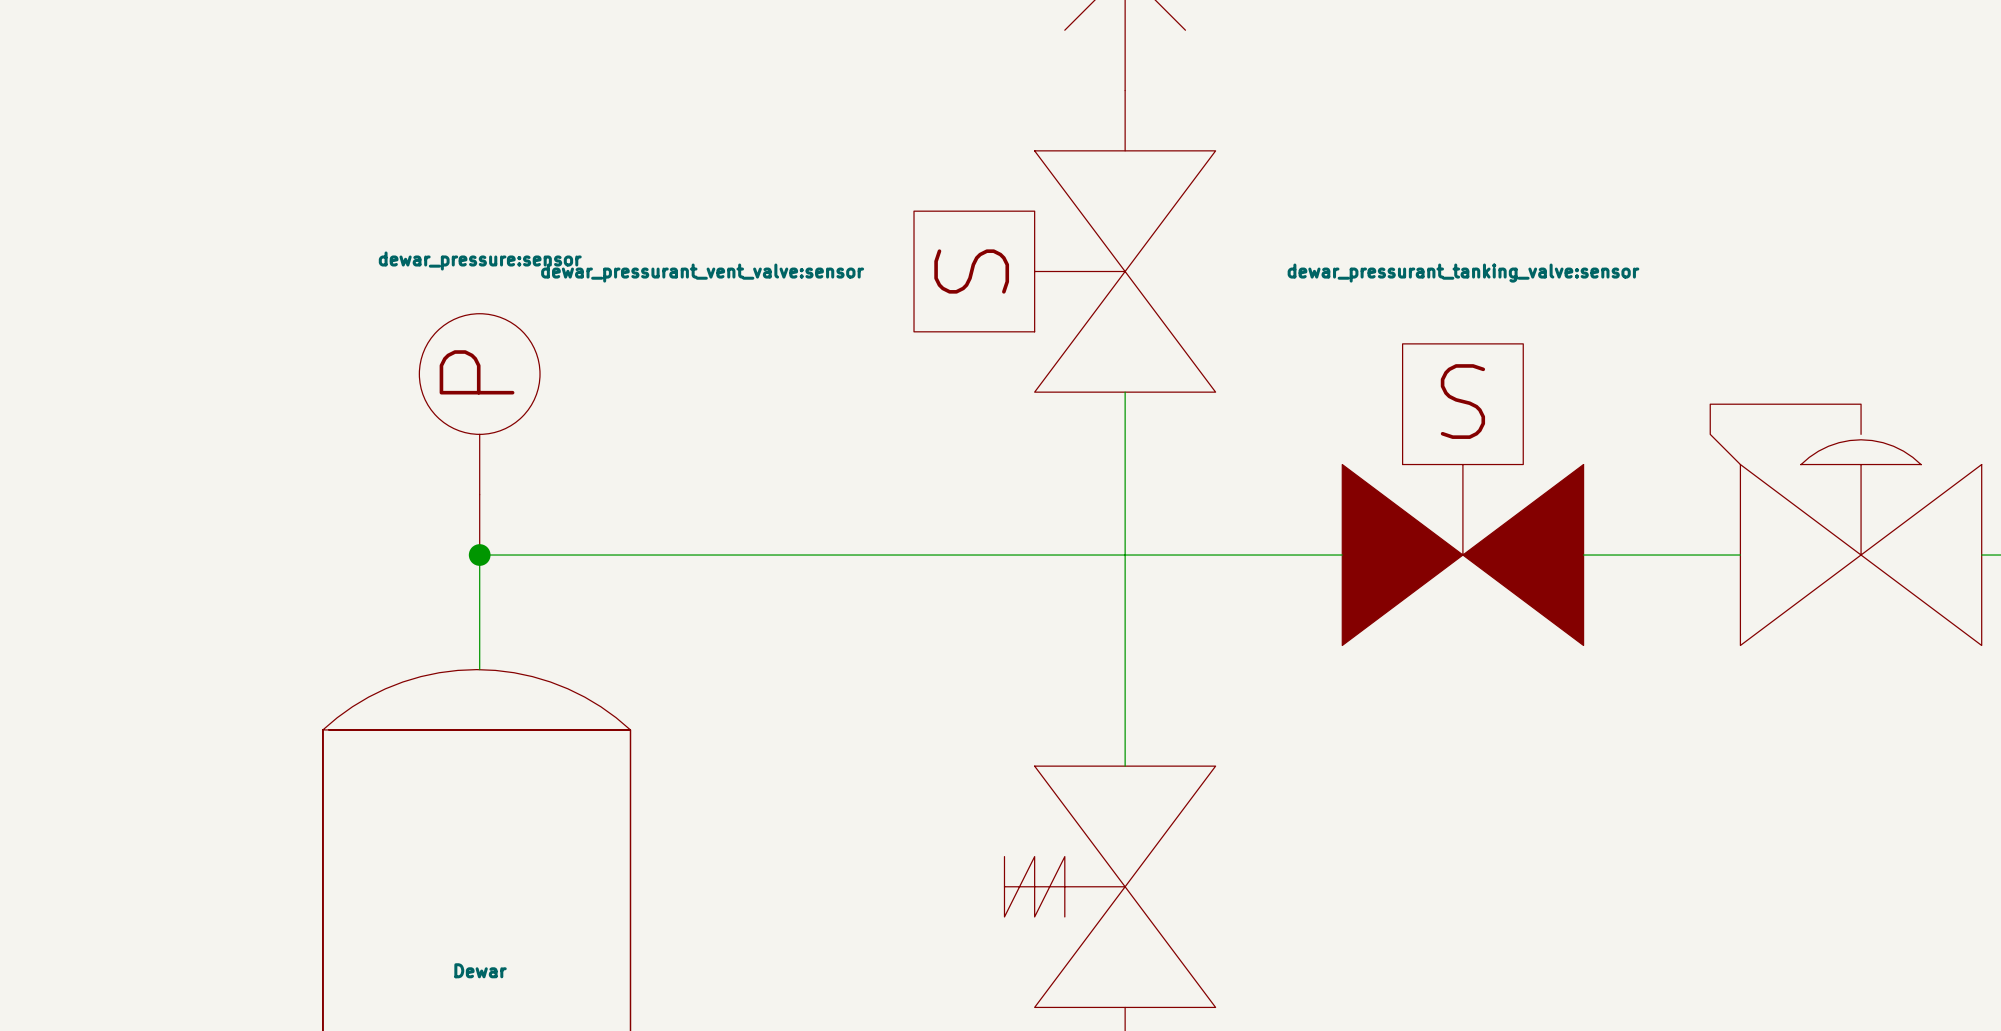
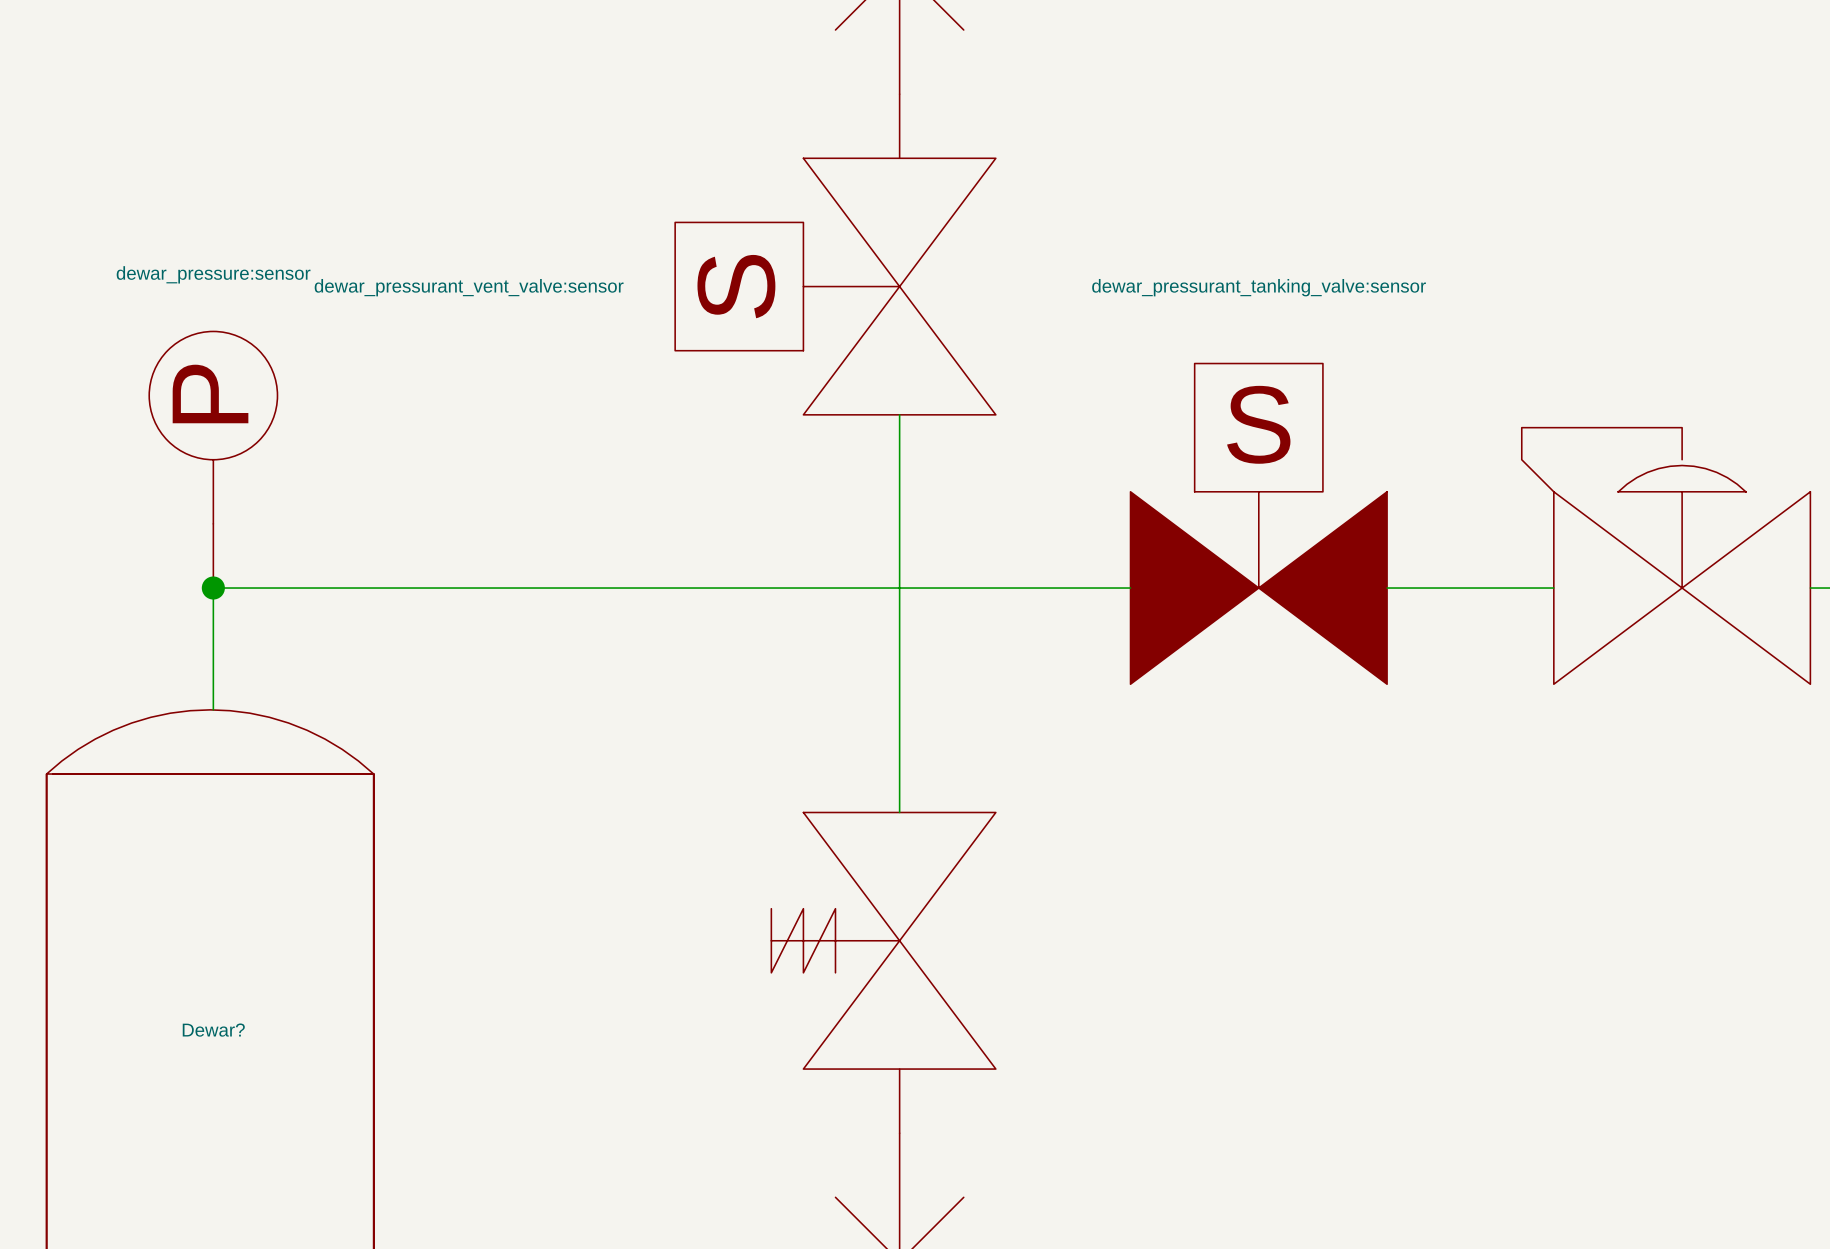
Dewar name: Dewar (480, 970) -> Dewar? (213, 1030)

